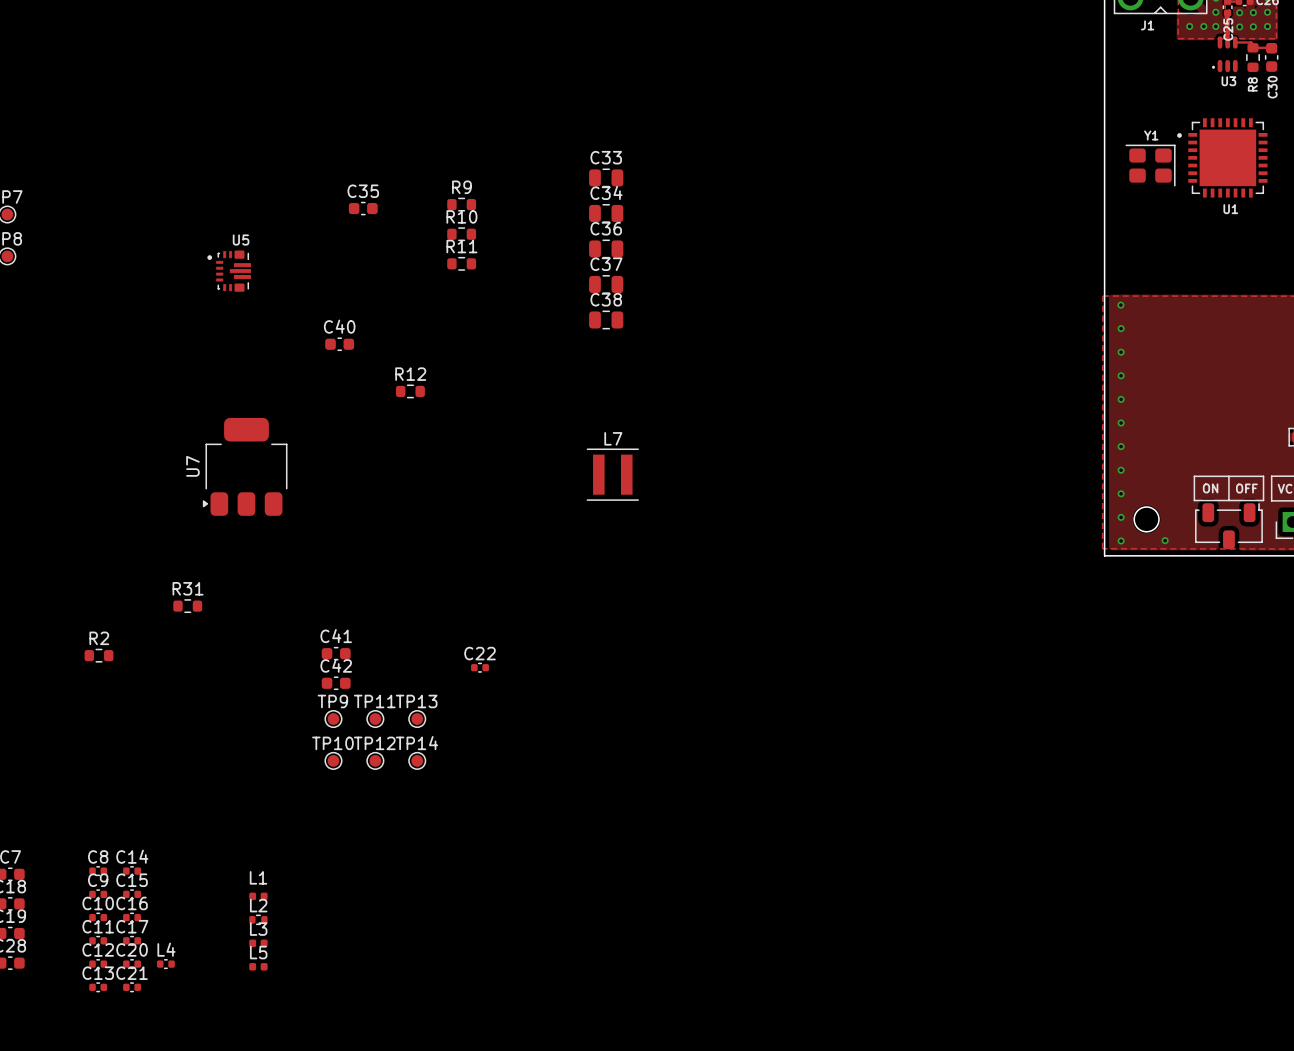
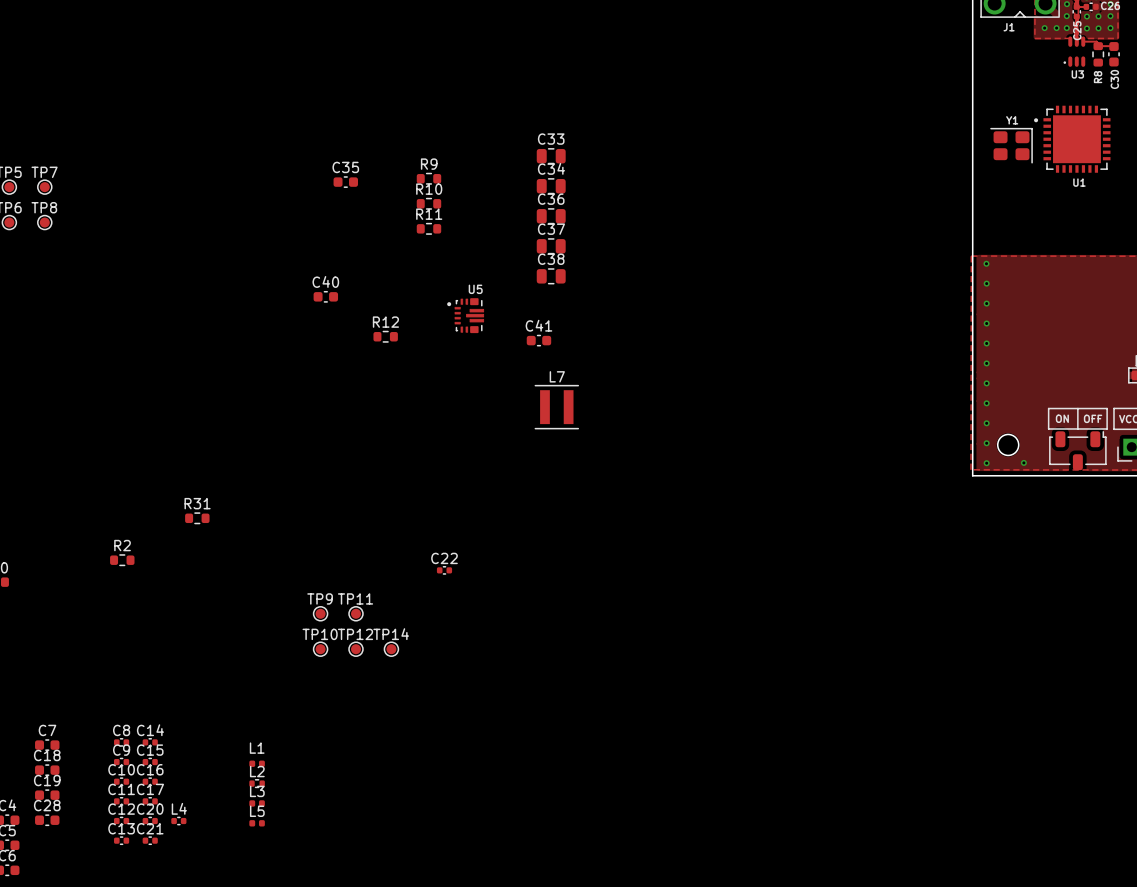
U5 position: (229, 271) -> (465, 315)
U7: (245, 466) -> none
C41 position: (336, 653) -> (538, 340)
C42: (336, 683) -> none
TP13: (417, 719) -> none

